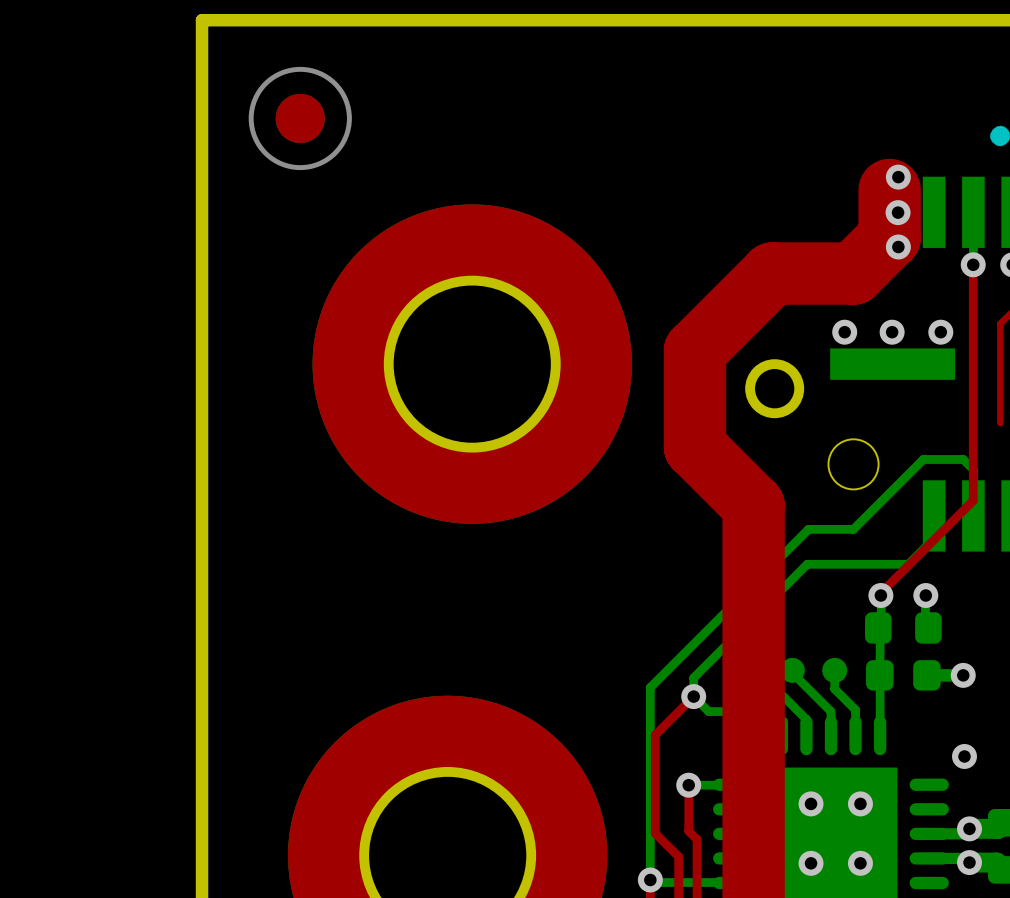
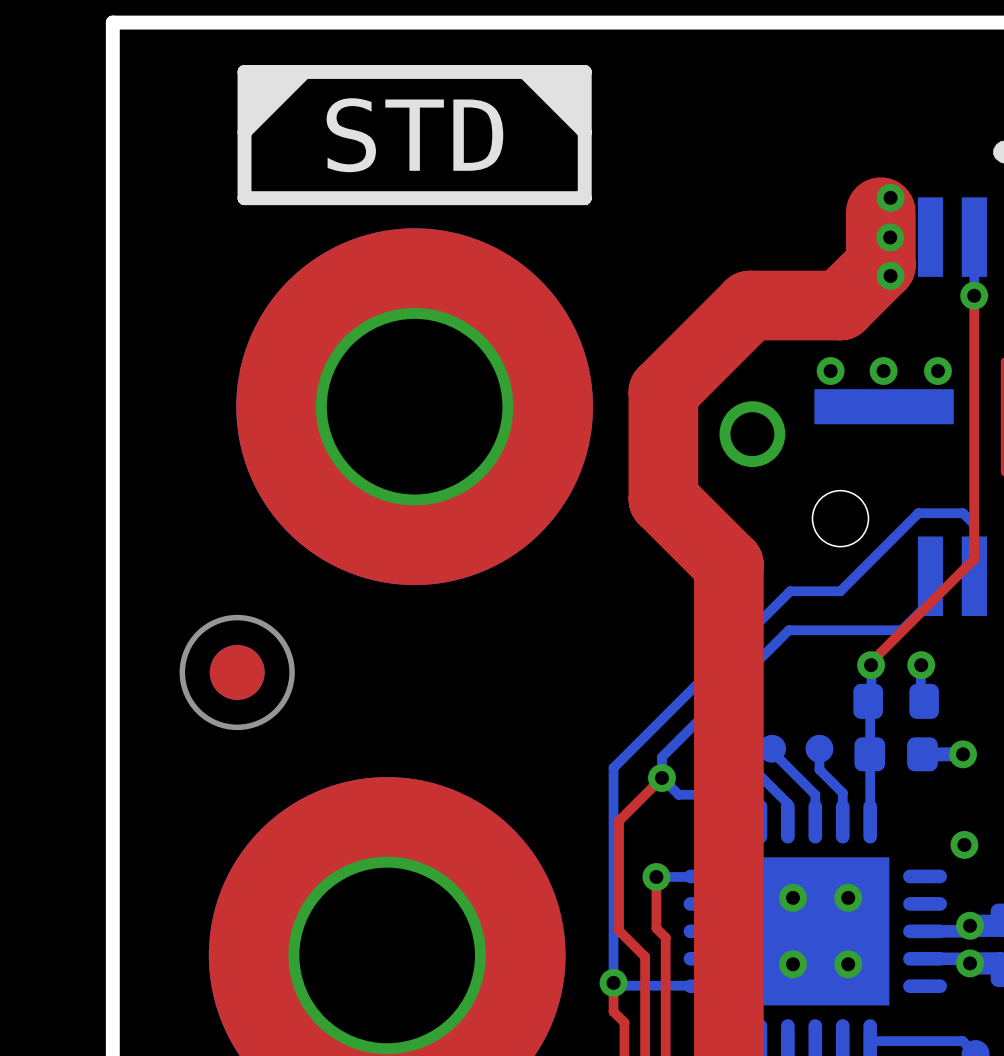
drawing: none -> [237, 64, 592, 206]
part position: (300, 118) -> (237, 672)

